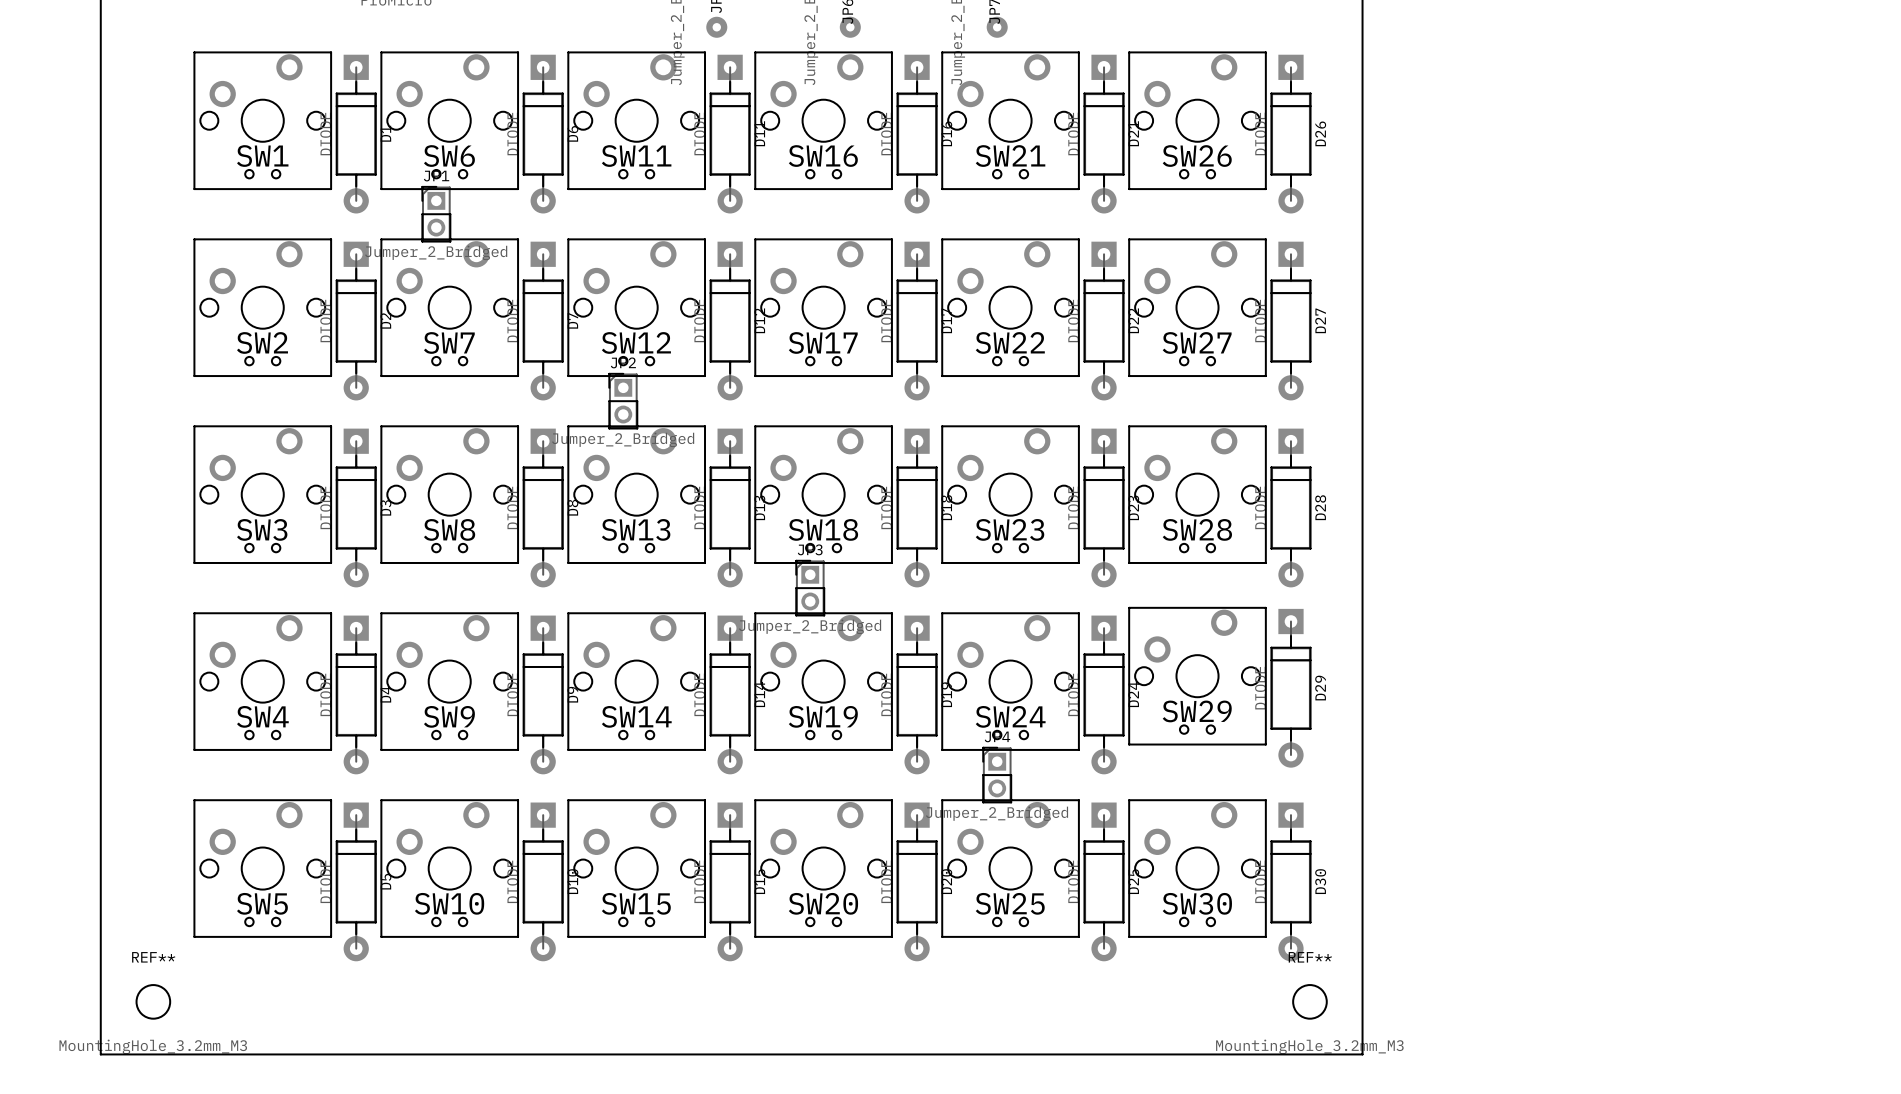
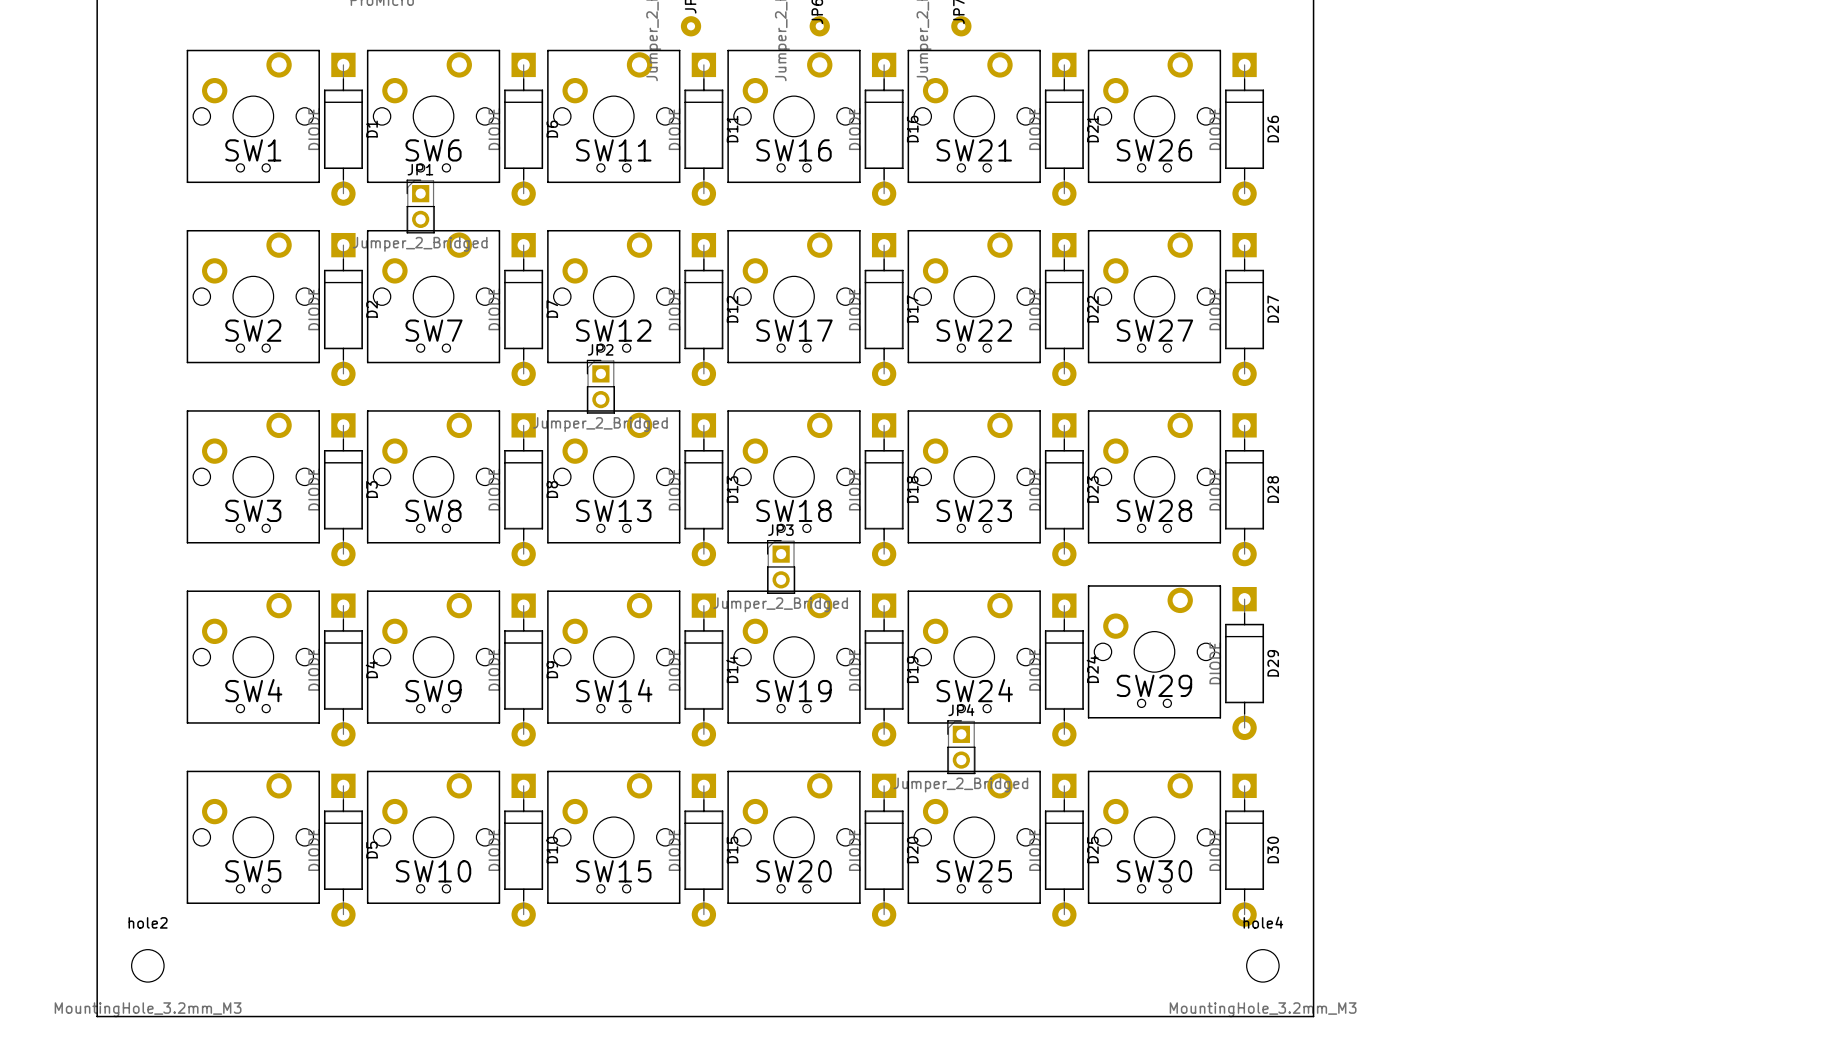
REF** name: REF** (153, 957) -> hole2 (148, 922)
REF** name: REF** (1310, 957) -> hole4 (1263, 922)

